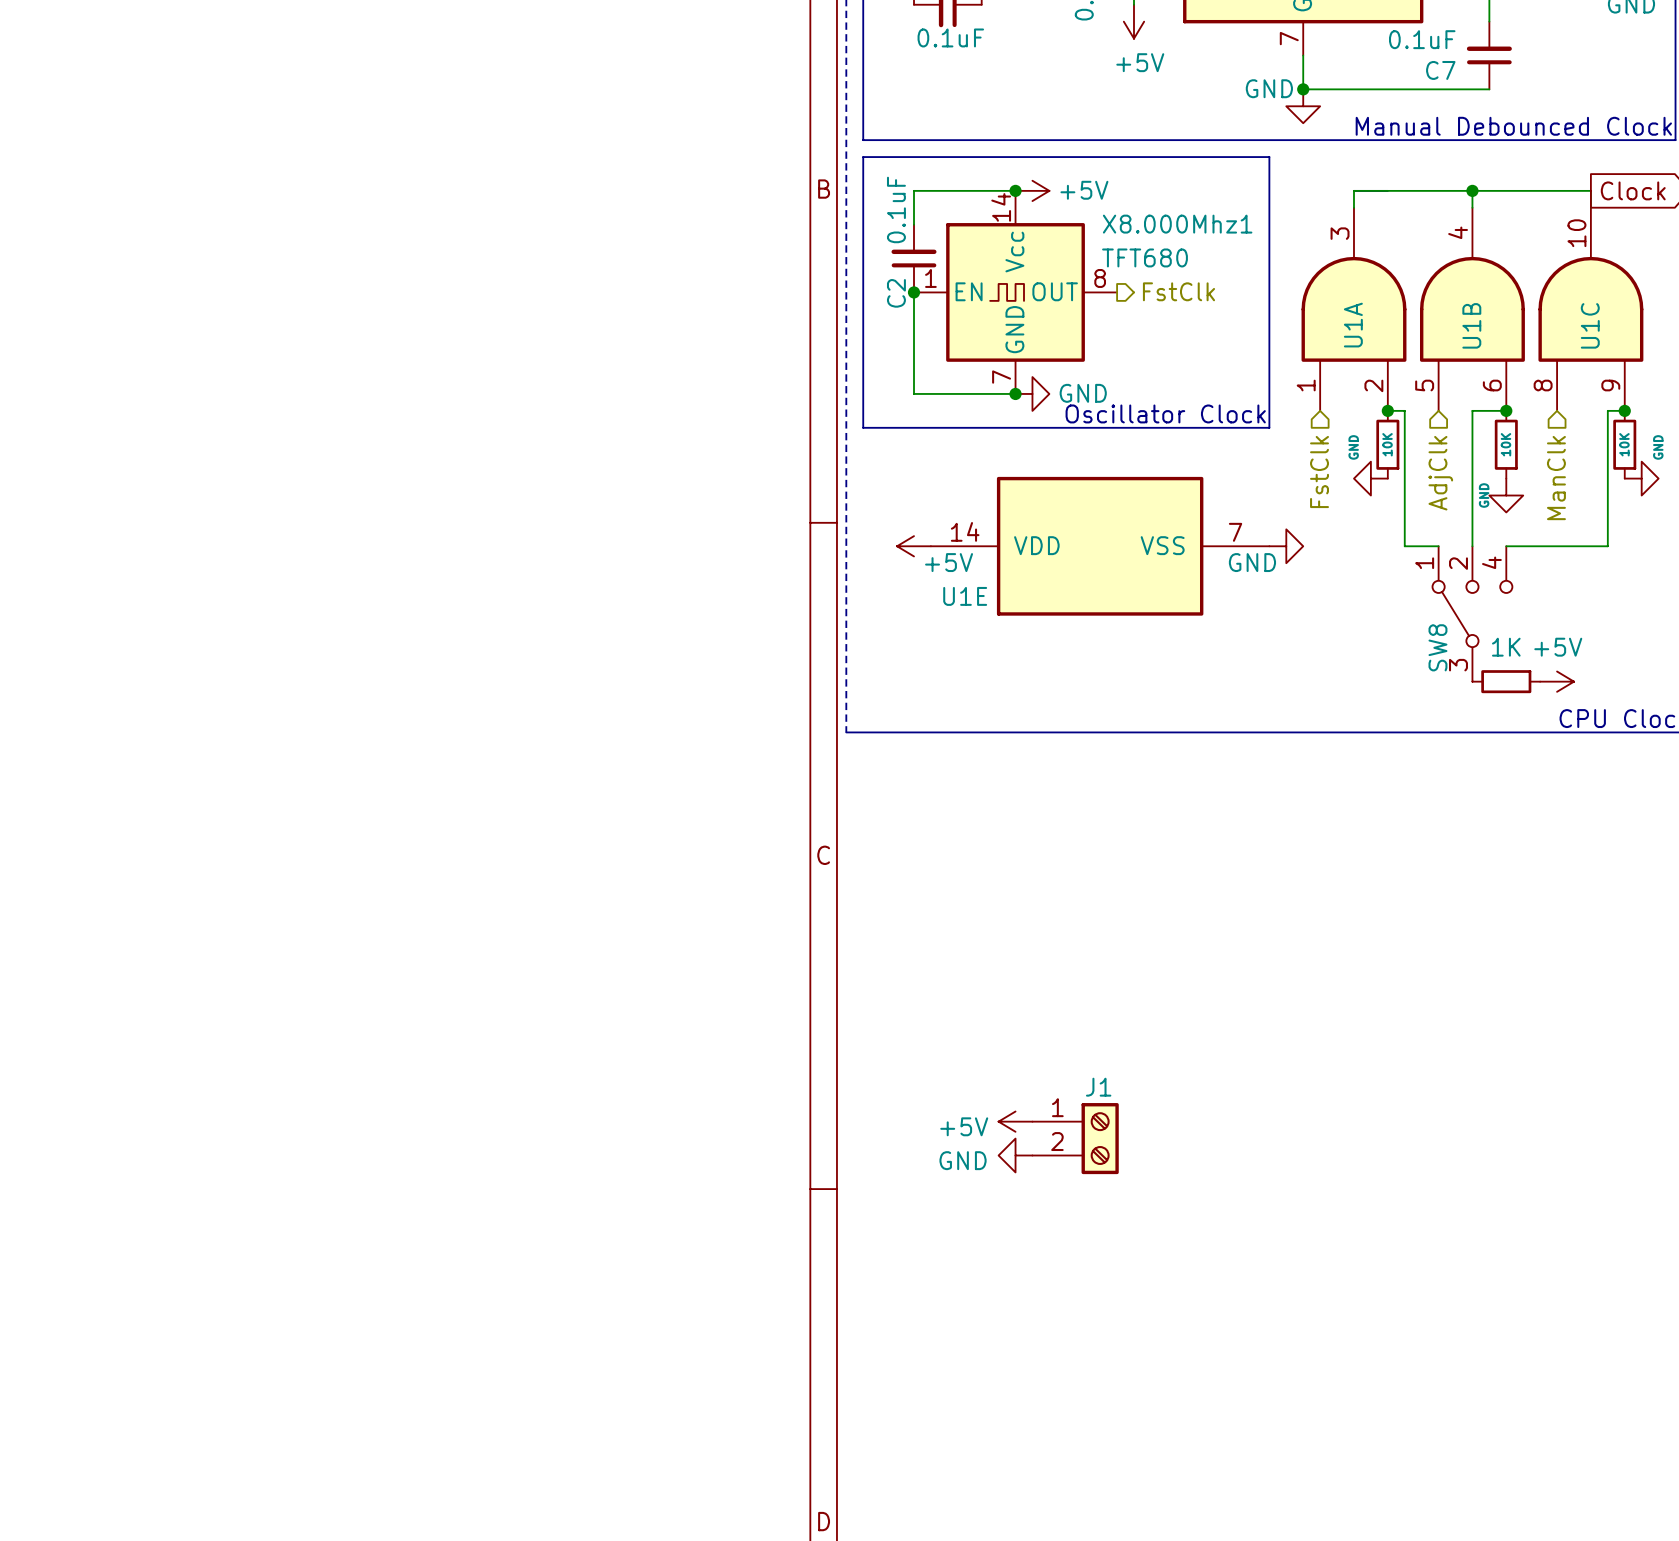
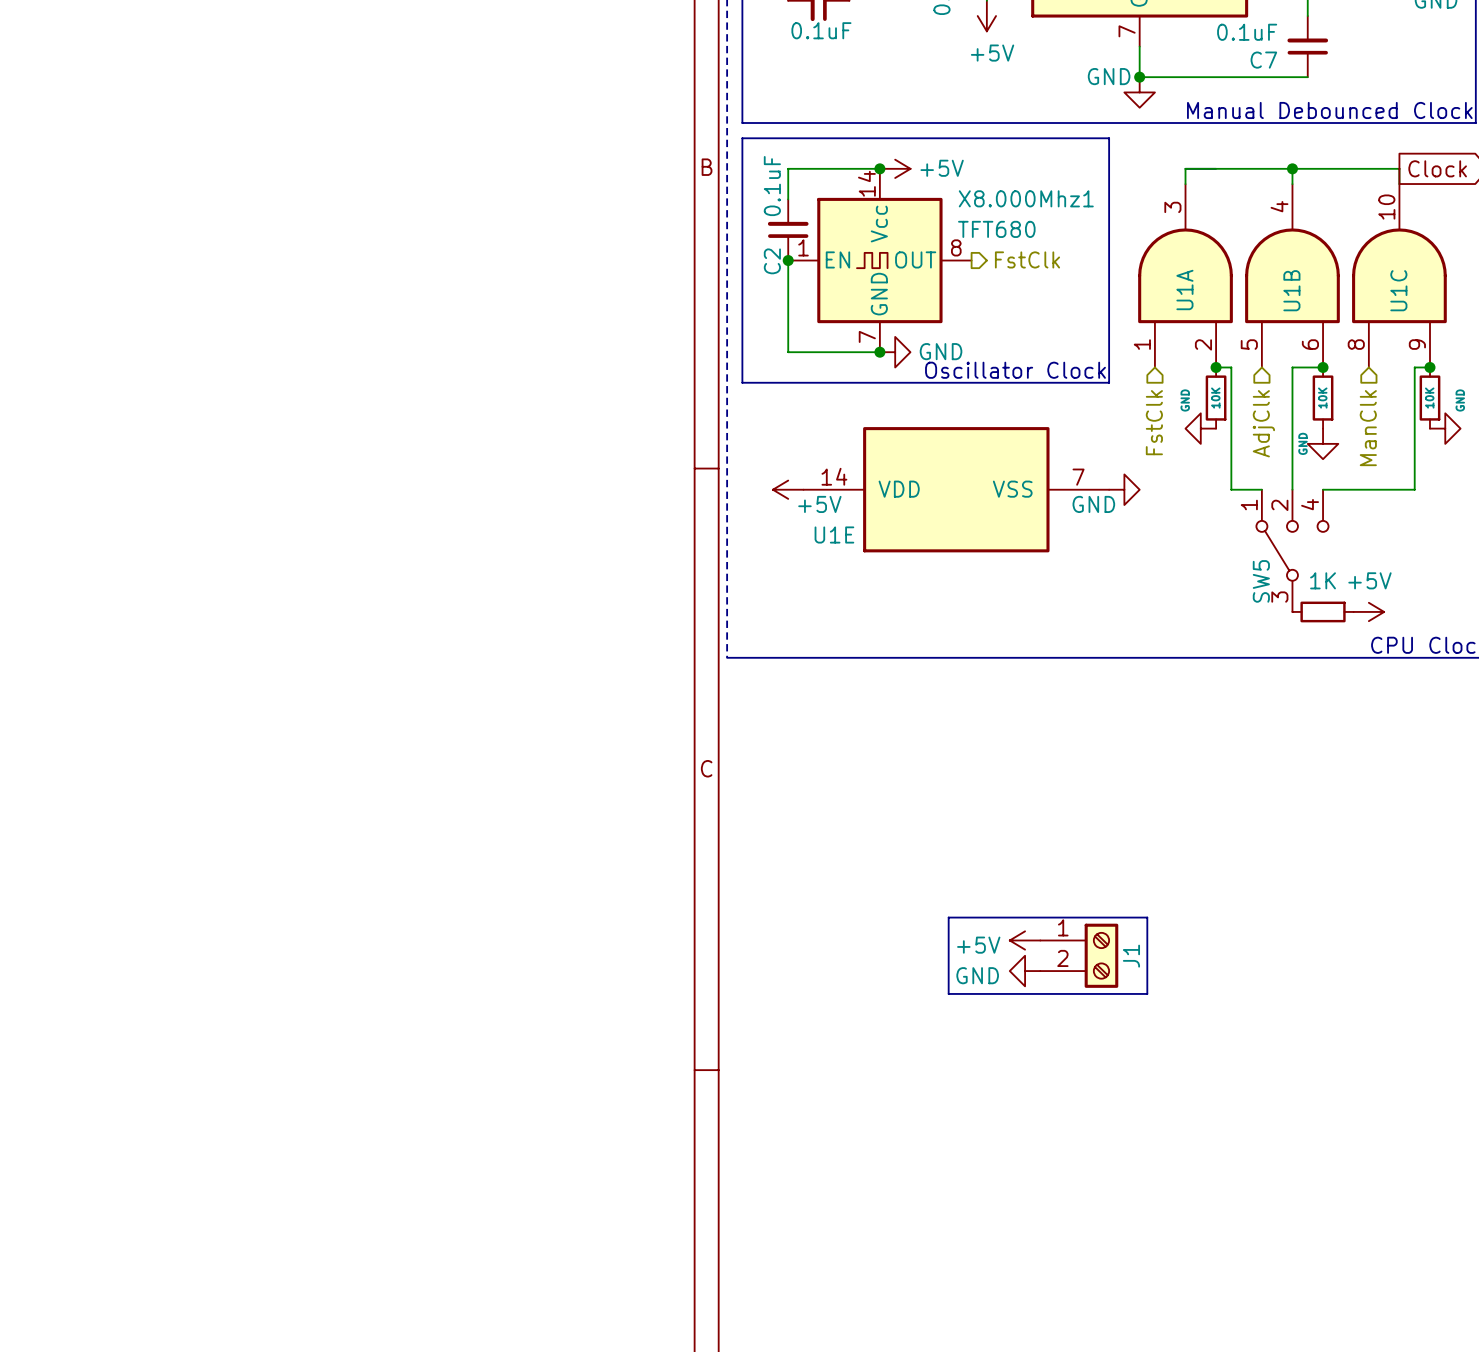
SW8 name: SW8 (1437, 647) -> SW5 (1261, 581)
line: none -> (948, 917) (948, 993) (1147, 993) (1147, 917) (948, 917)
J1 name rotation: 0° (1098, 1087) -> 90° counterclockwise (1131, 956)
J1 name position: J1 (1098, 1087) -> J1 (1131, 956)
power symbol position: +5V (1015, 1121) -> +5V (1025, 940)
J1 position: (1075, 1138) -> (1079, 955)
power symbol position: GND (1015, 1155) -> GND (1025, 971)

